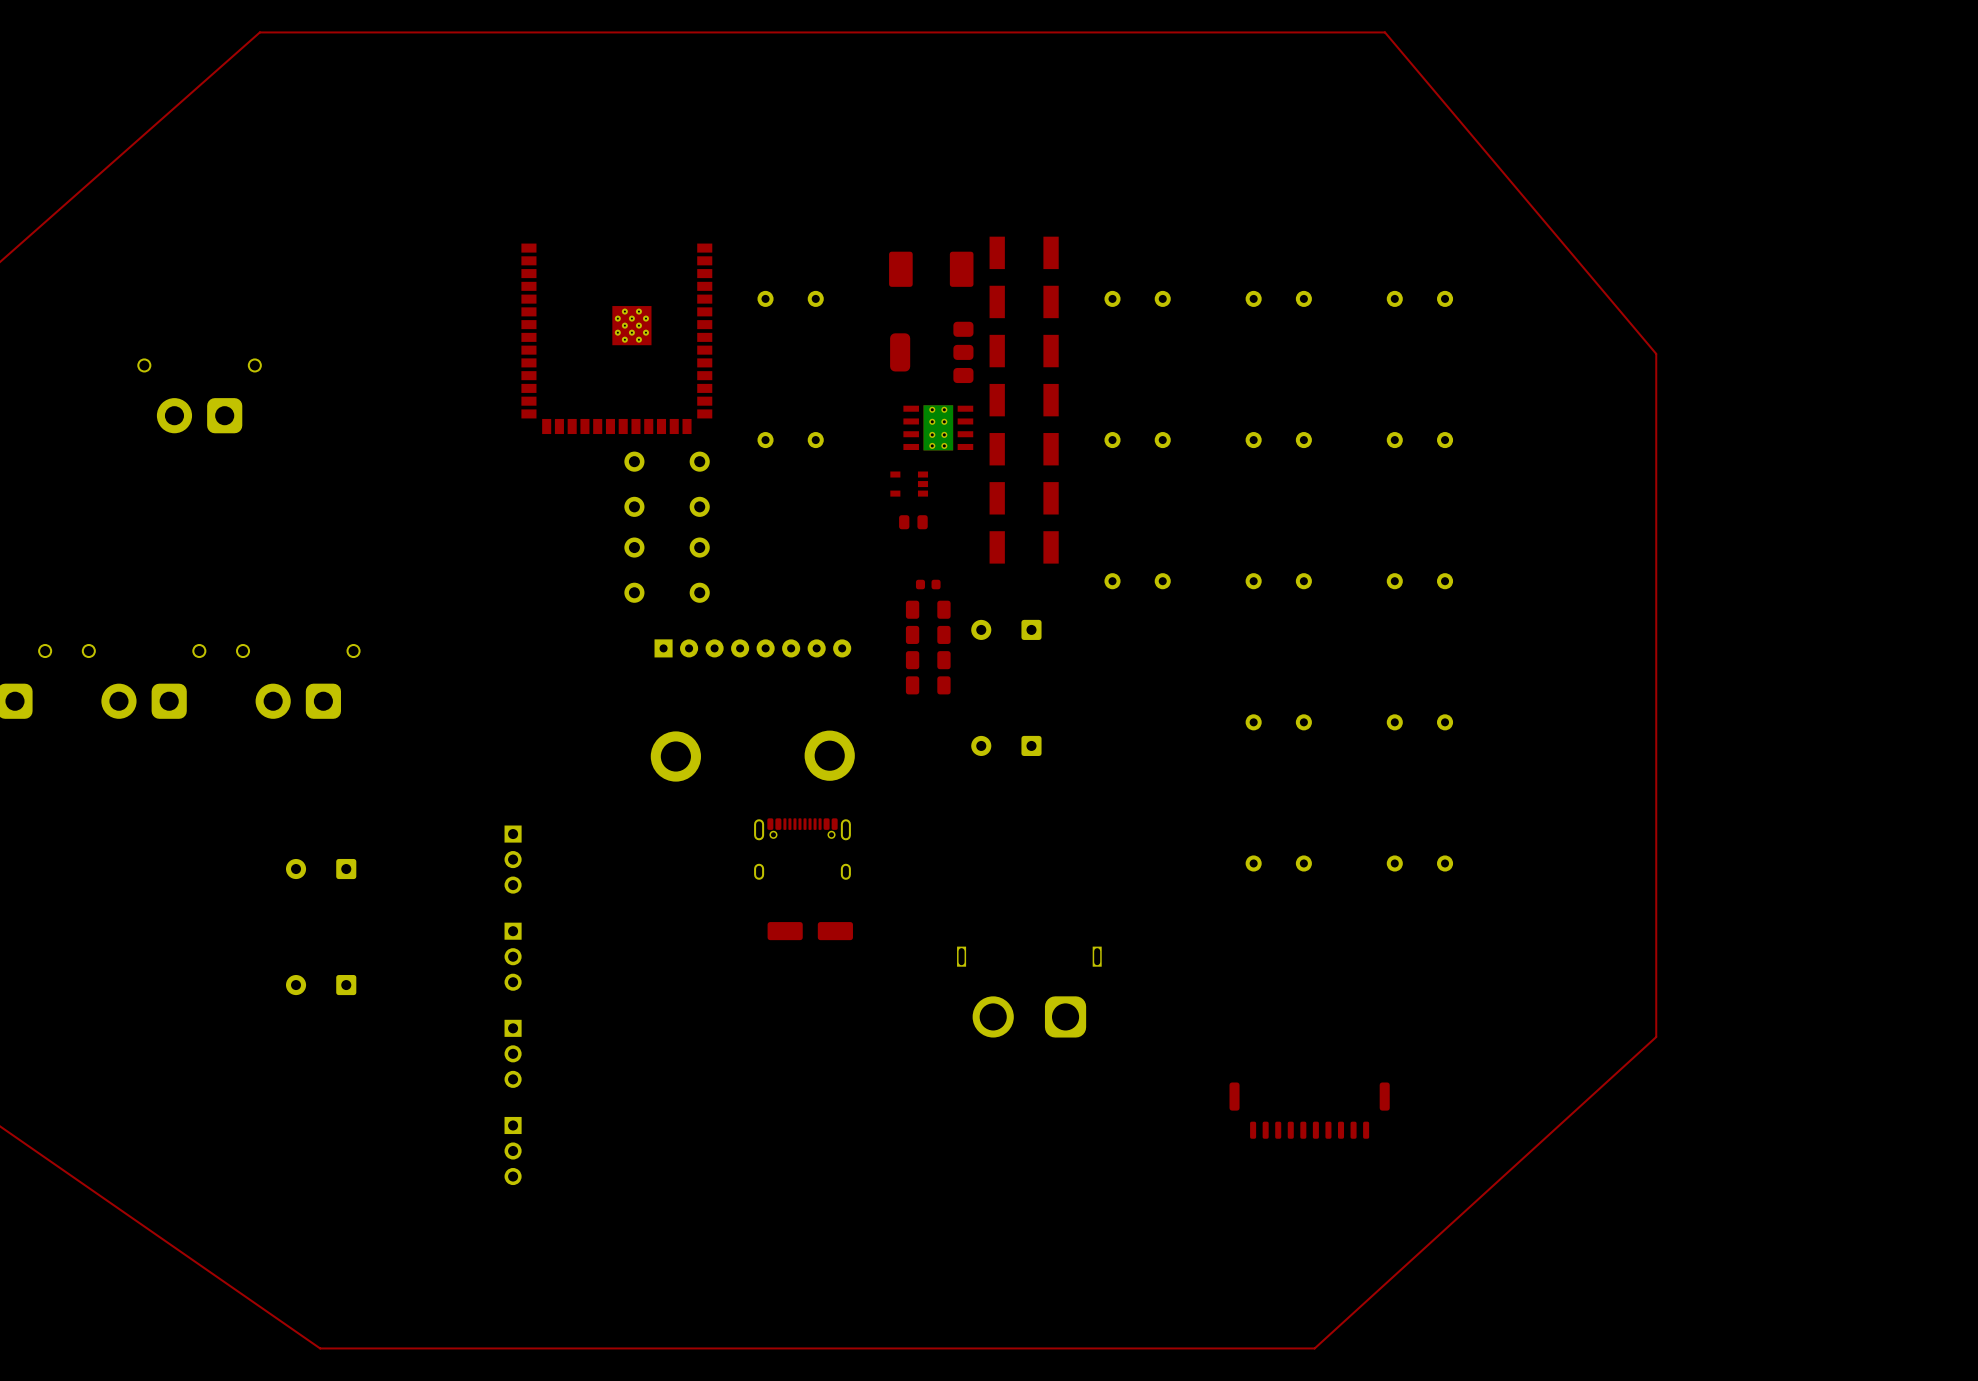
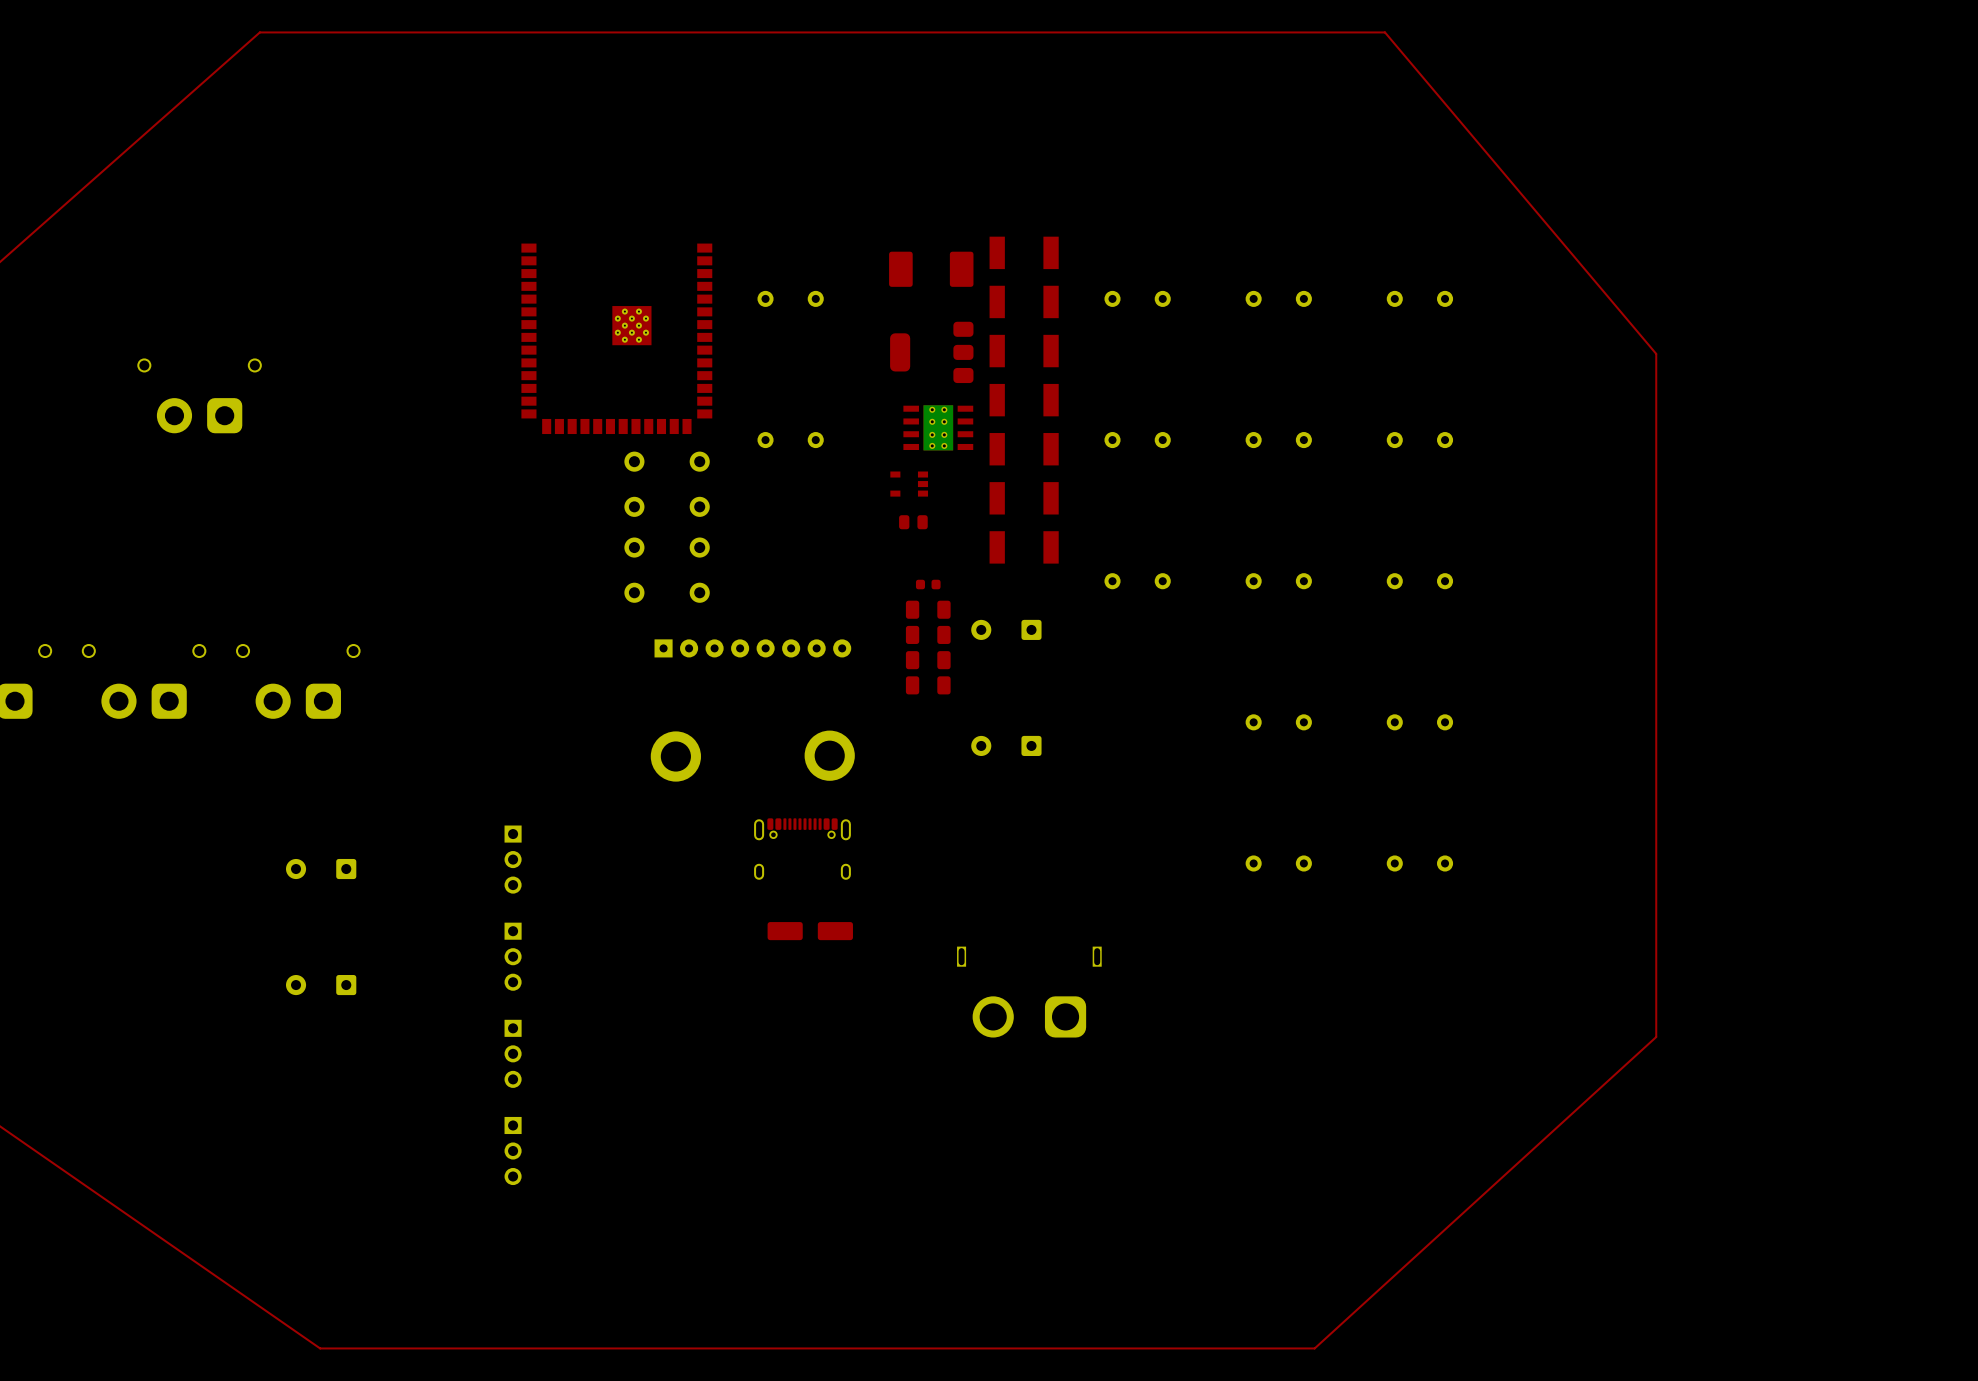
part: (1309, 1110) -> none

